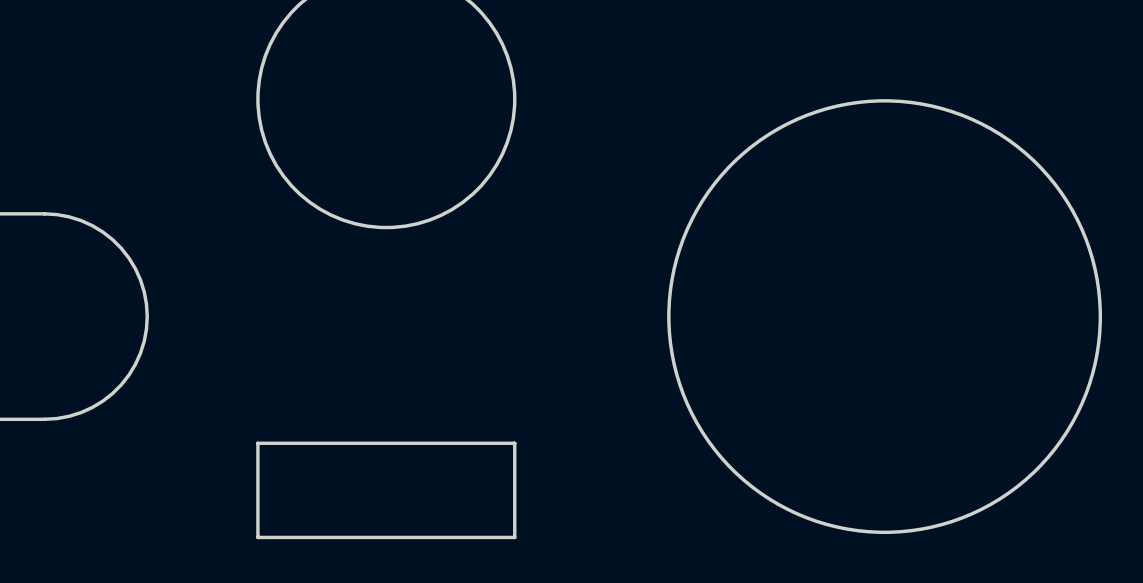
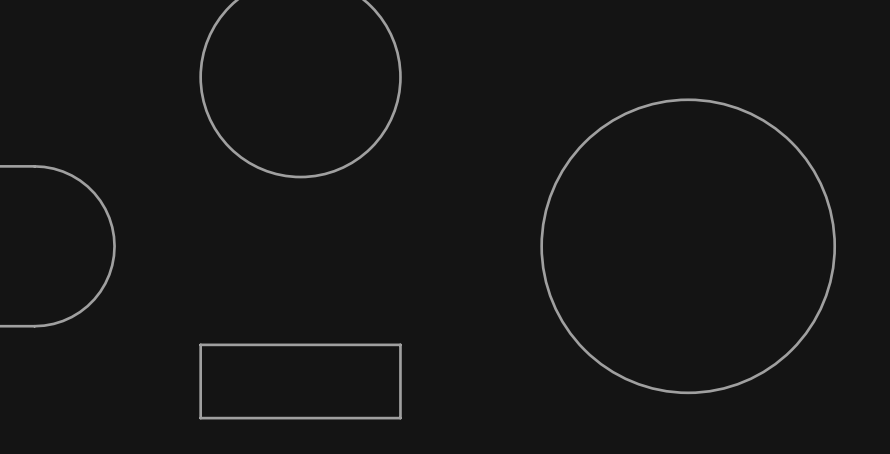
round board edge size: [667, 99, 1103, 535] -> [540, 98, 837, 395]

